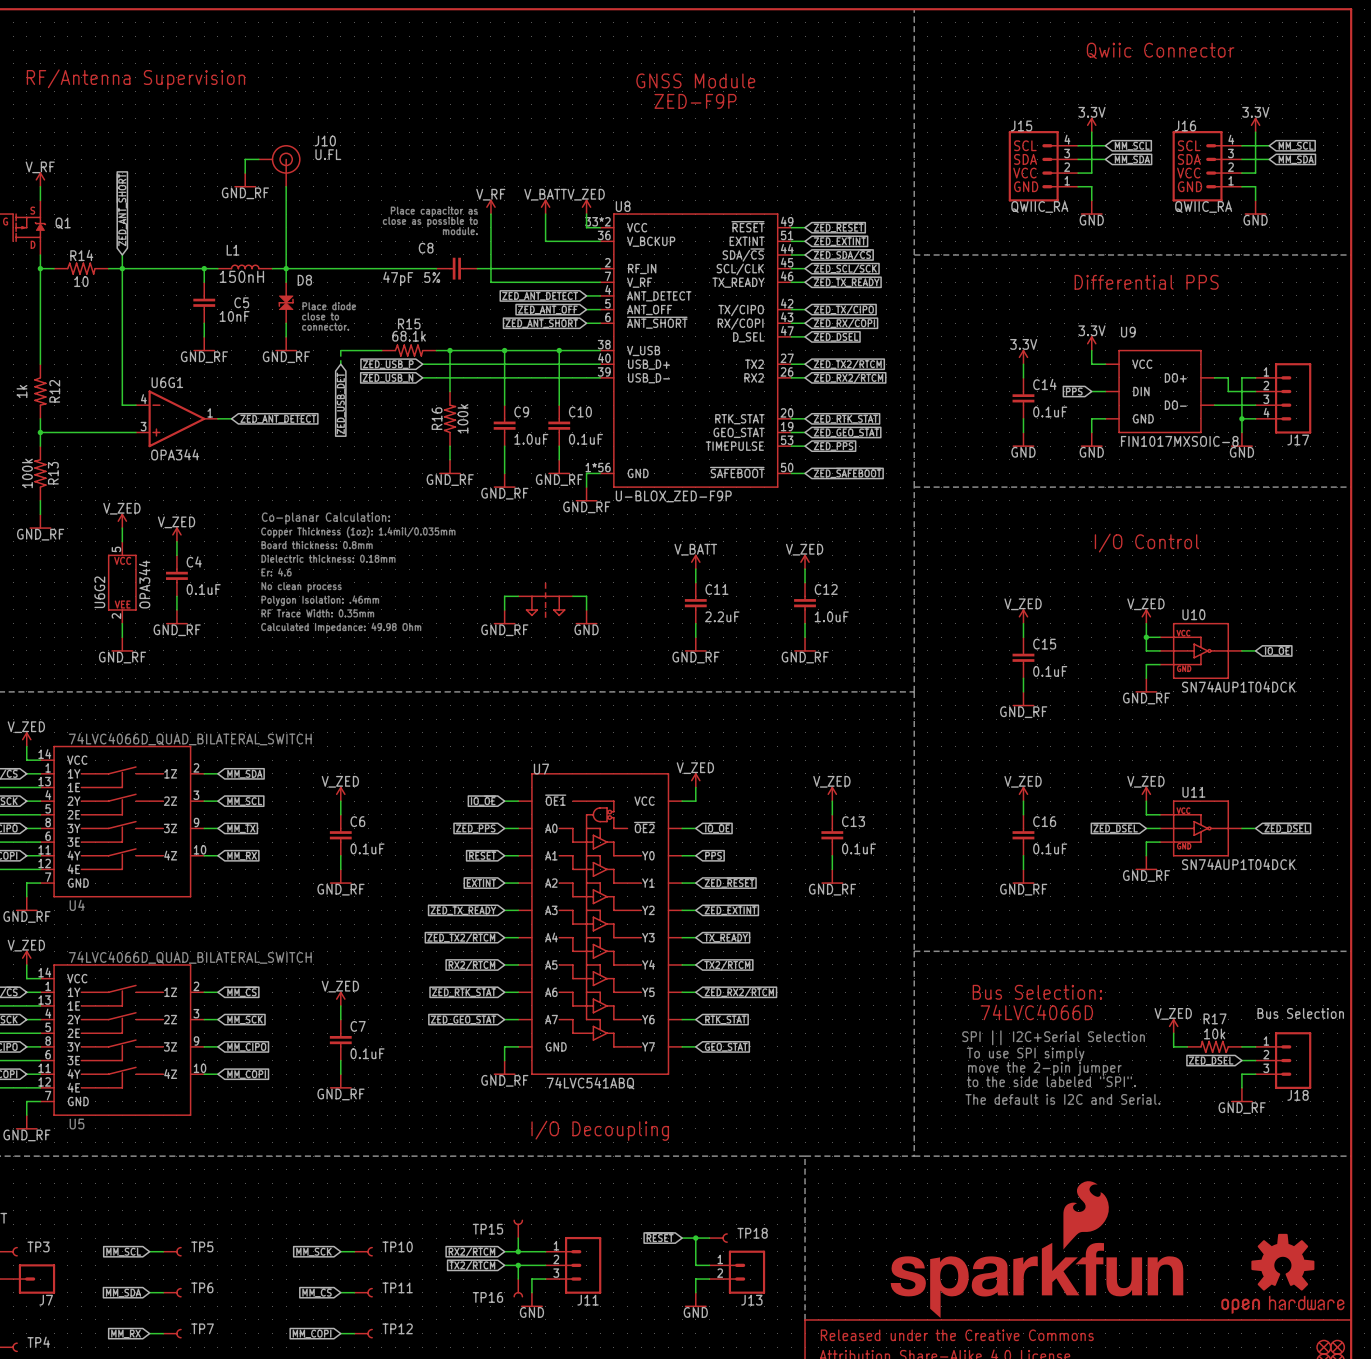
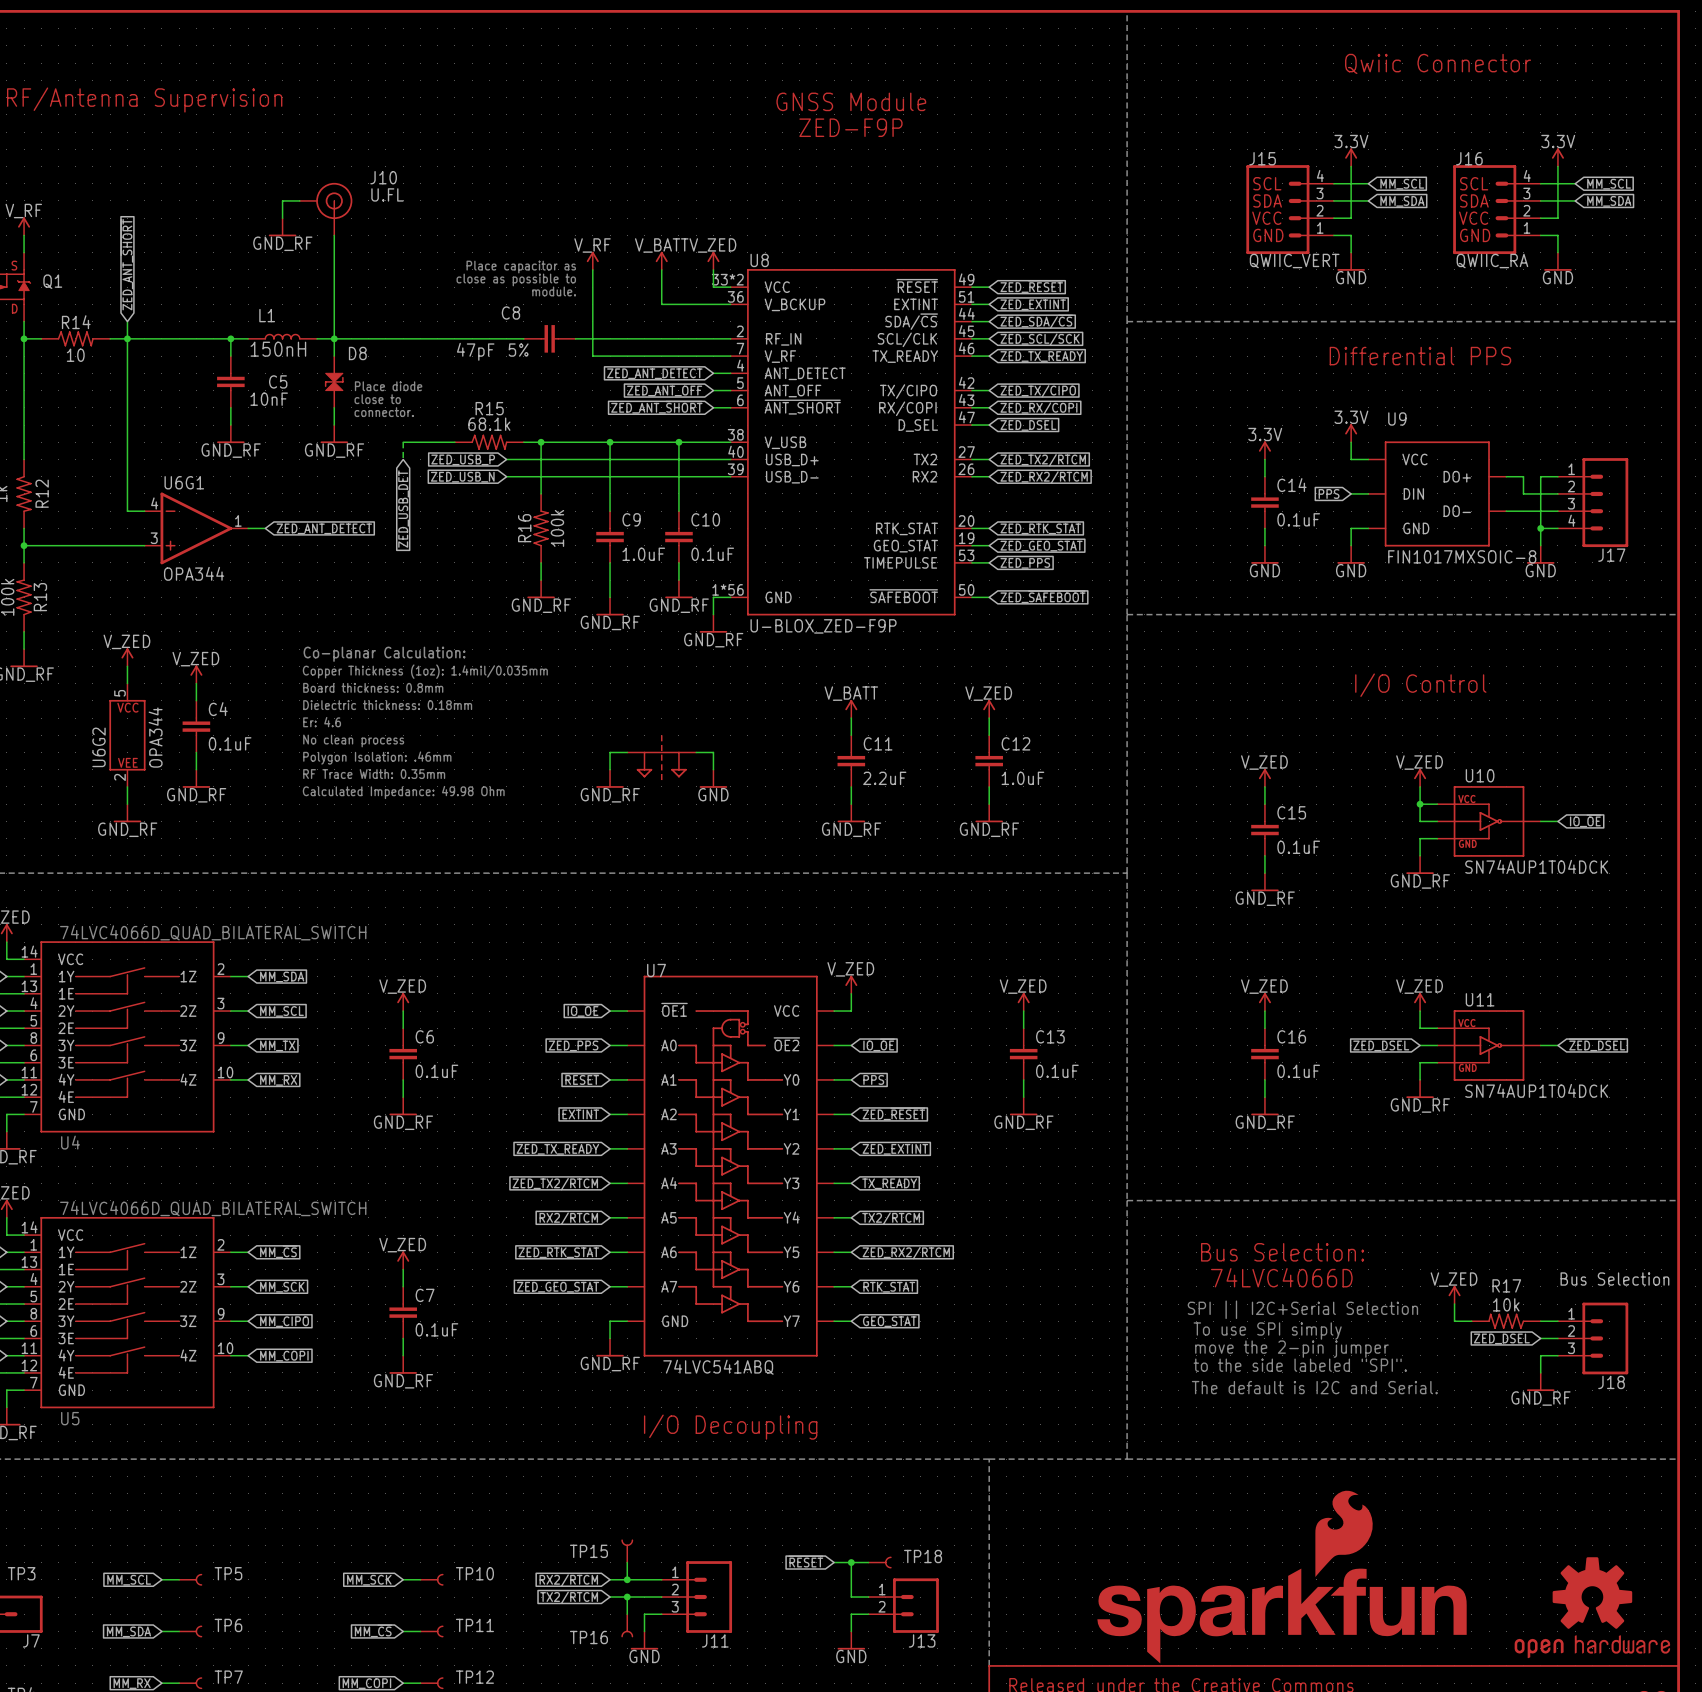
J15 value: QWIIC_RA (1039, 206) -> QWIIC_VERT (1294, 261)

